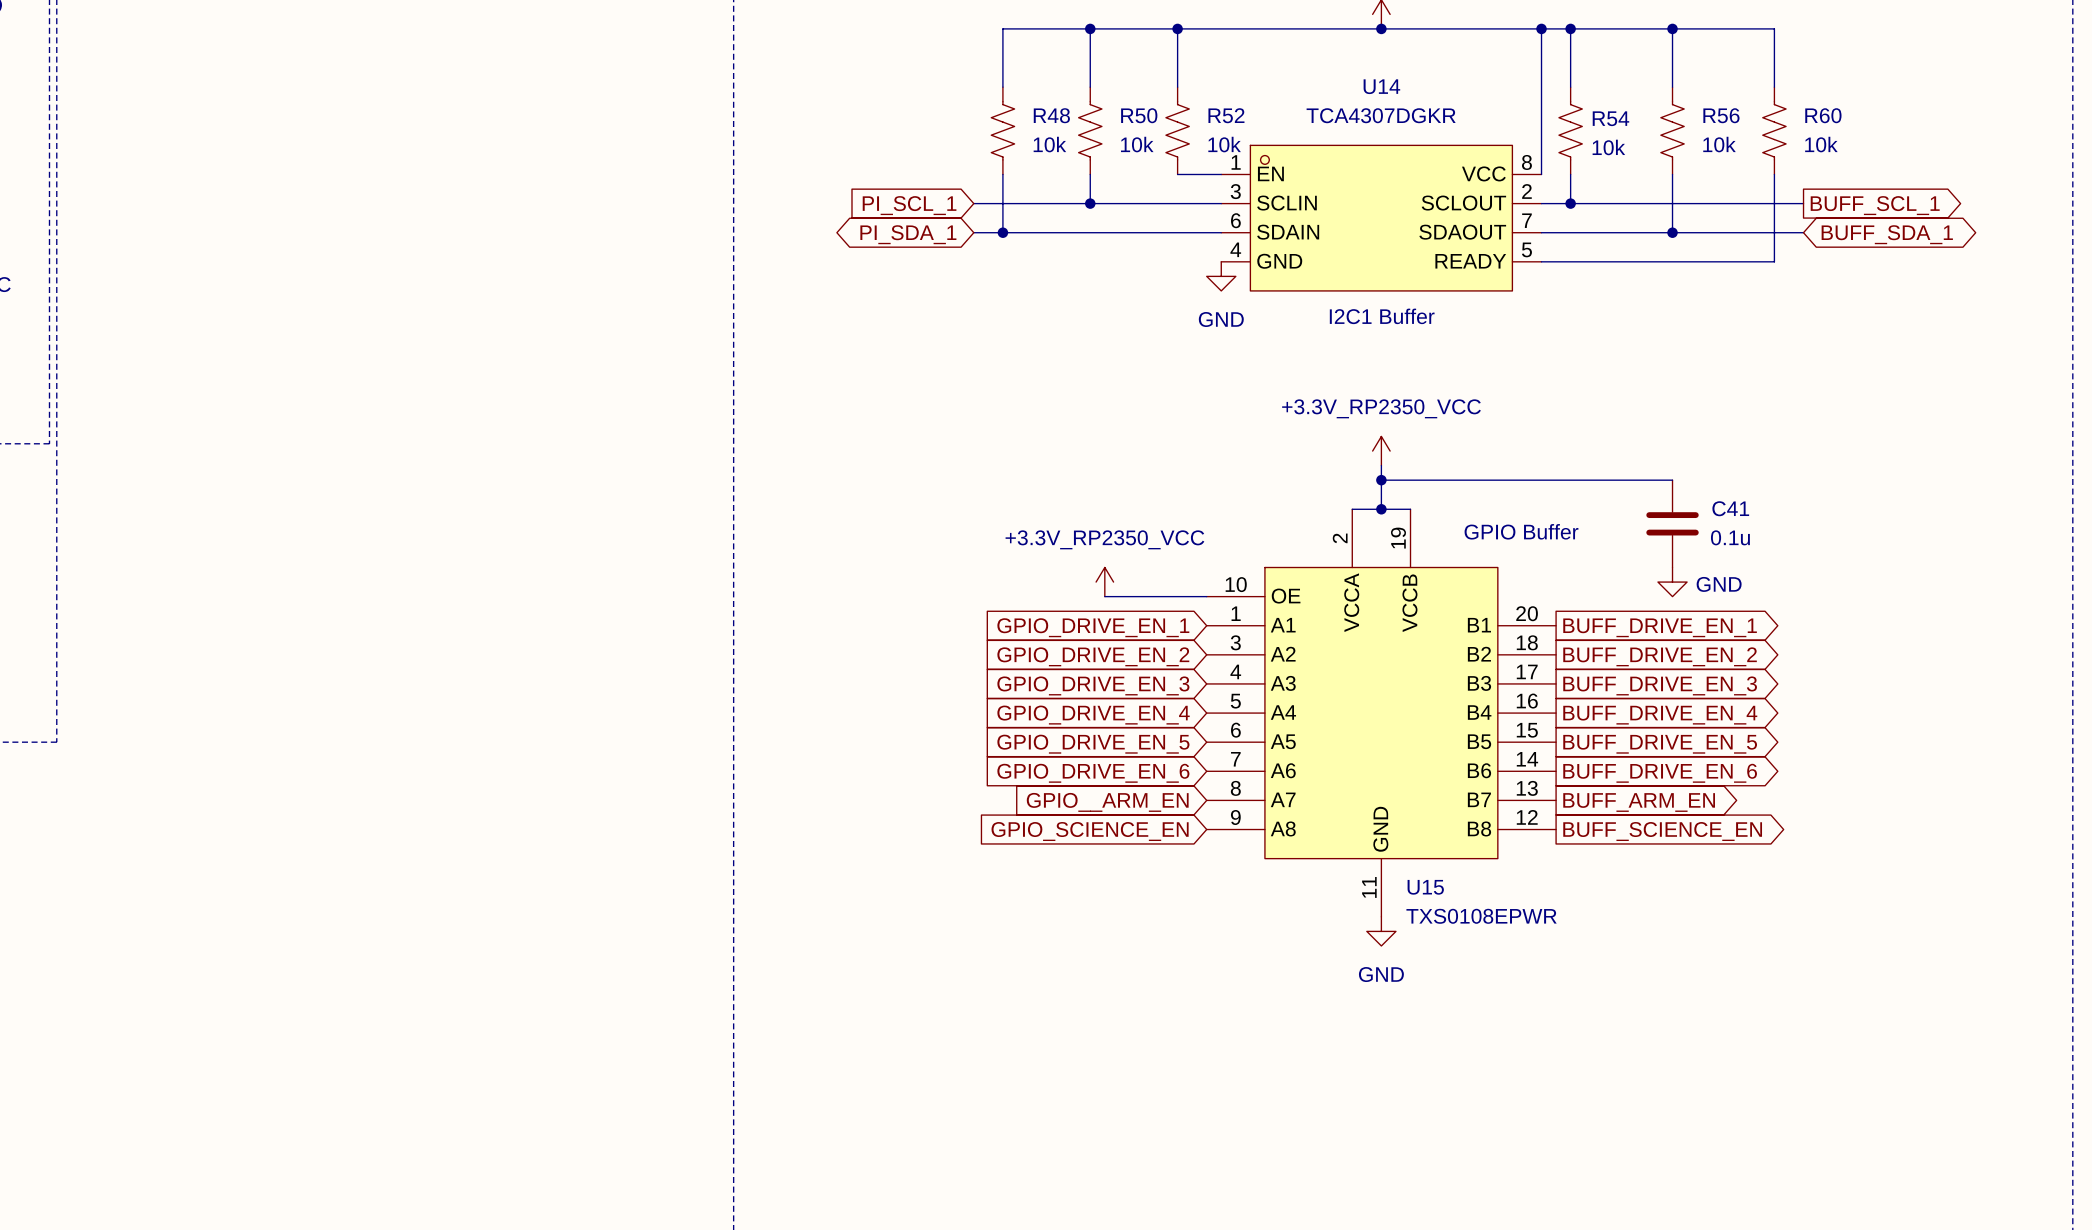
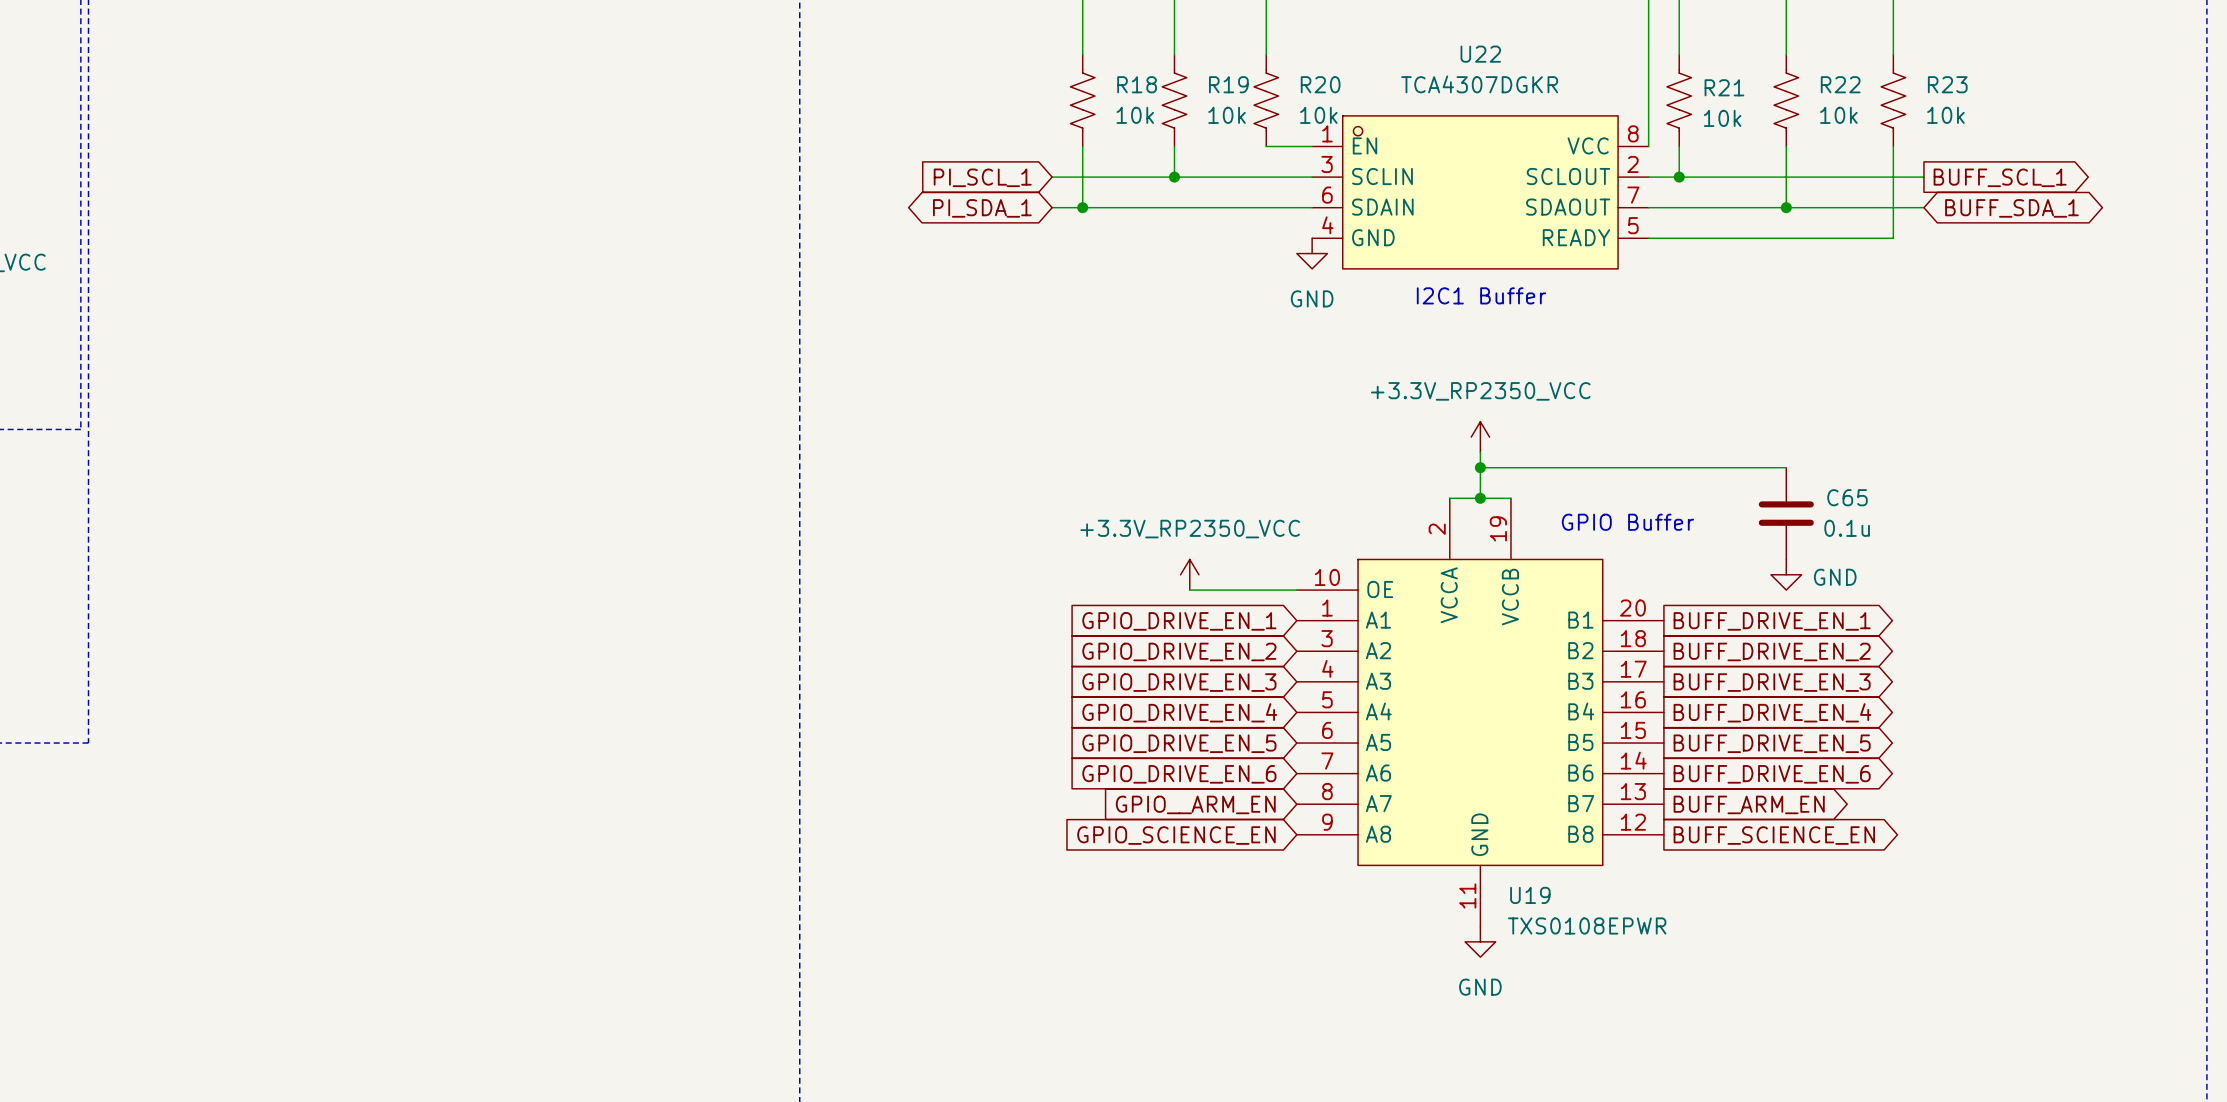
U14 name: U14 (1381, 86) -> U22 (1480, 54)
R48 name: R48 (1051, 115) -> R18 (1137, 84)
R50 name: R50 (1139, 115) -> R19 (1228, 84)
R52 name: R52 (1226, 115) -> R20 (1320, 84)
R56 name: R56 (1721, 115) -> R22 (1840, 84)
R60 name: R60 (1823, 115) -> R23 (1947, 84)
R54 name: R54 (1610, 118) -> R21 (1724, 87)
C41 name: C41 (1730, 508) -> C65 (1847, 497)
U15 name: U15 (1425, 887) -> U19 (1530, 895)

